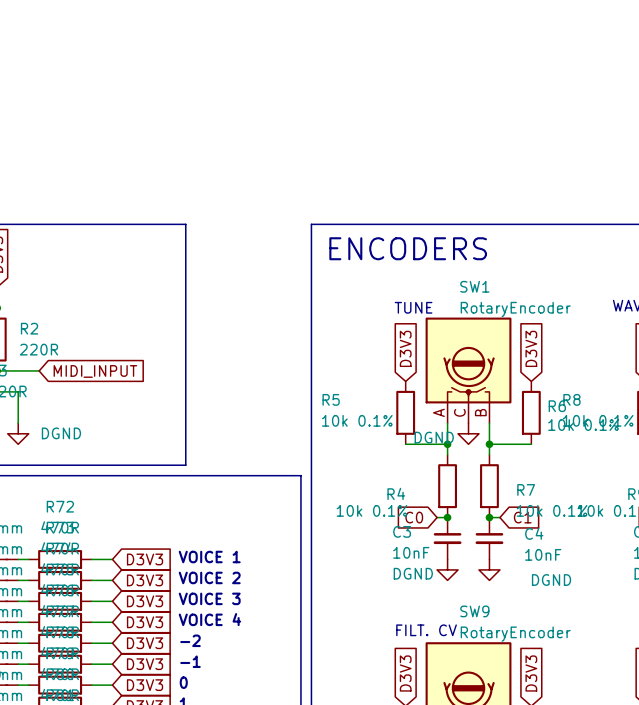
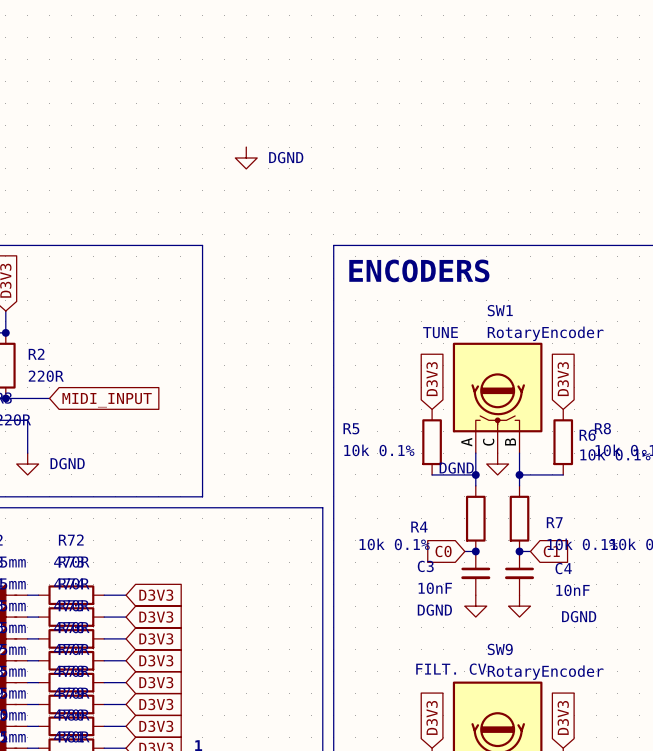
power symbol: none -> DGND (246, 158)
text: VOICE 1 (209, 557) -> none
text: VOICE 2 (209, 577) -> none
text: VOICE 3 (209, 598) -> none
text: VOICE 4 (209, 619) -> none
text: -2 (190, 640) -> none
text: -1 (190, 661) -> none
text: 0 (183, 682) -> none

